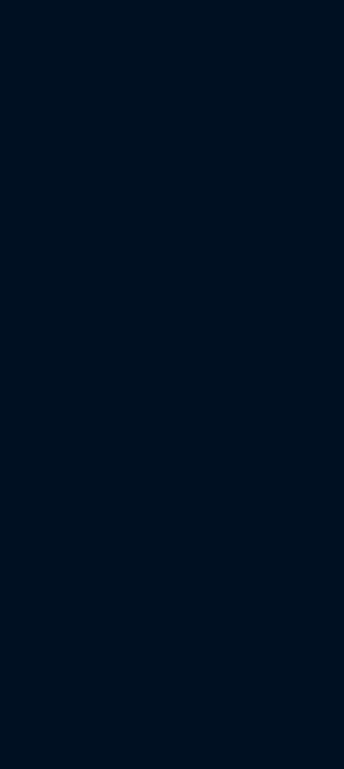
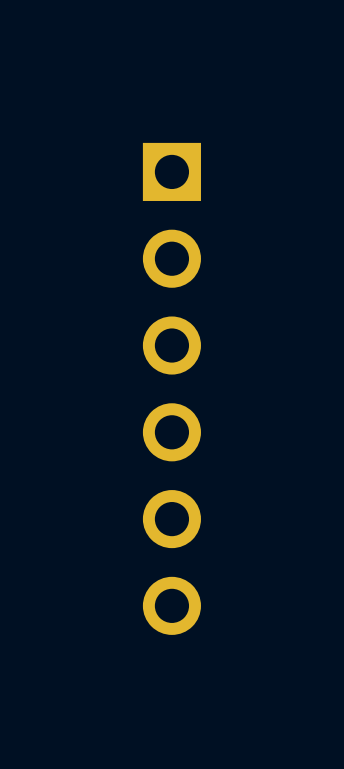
part: none -> (171, 388)

